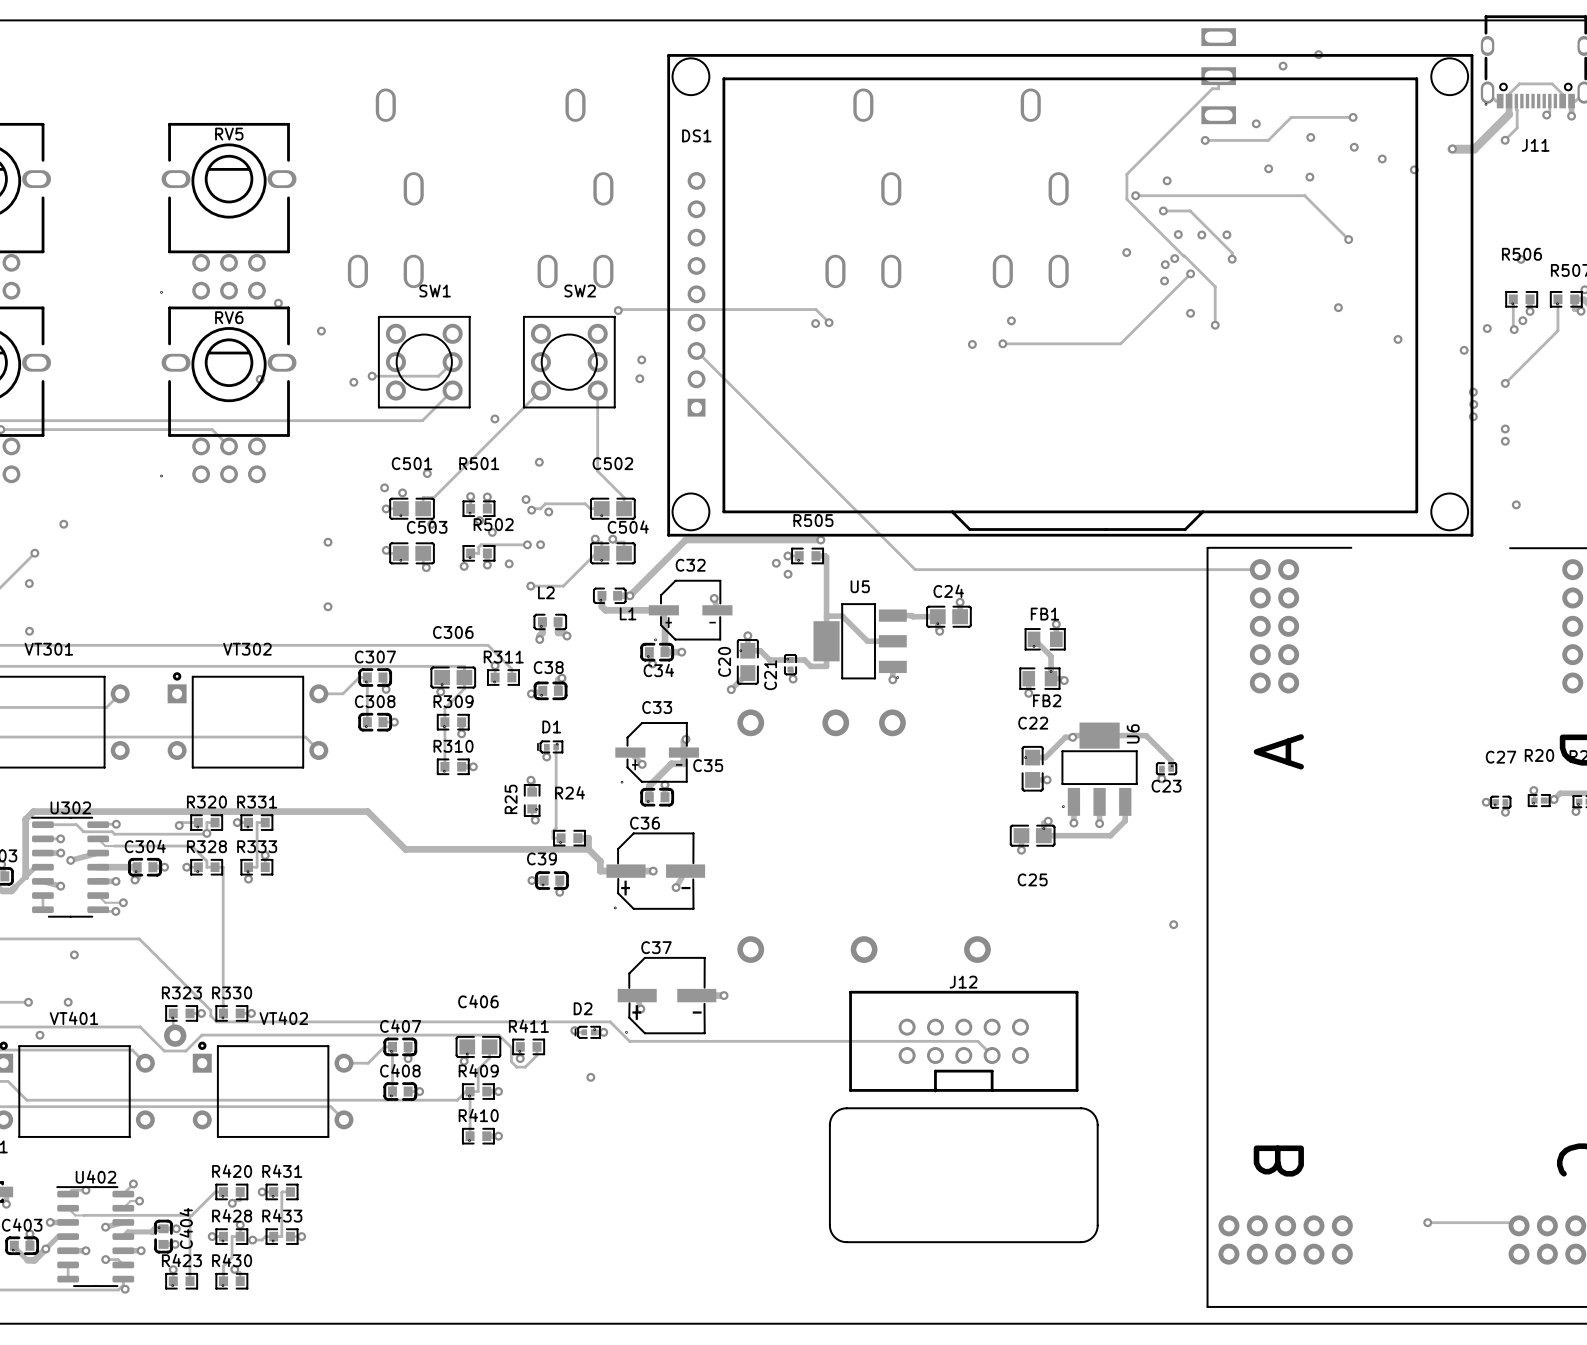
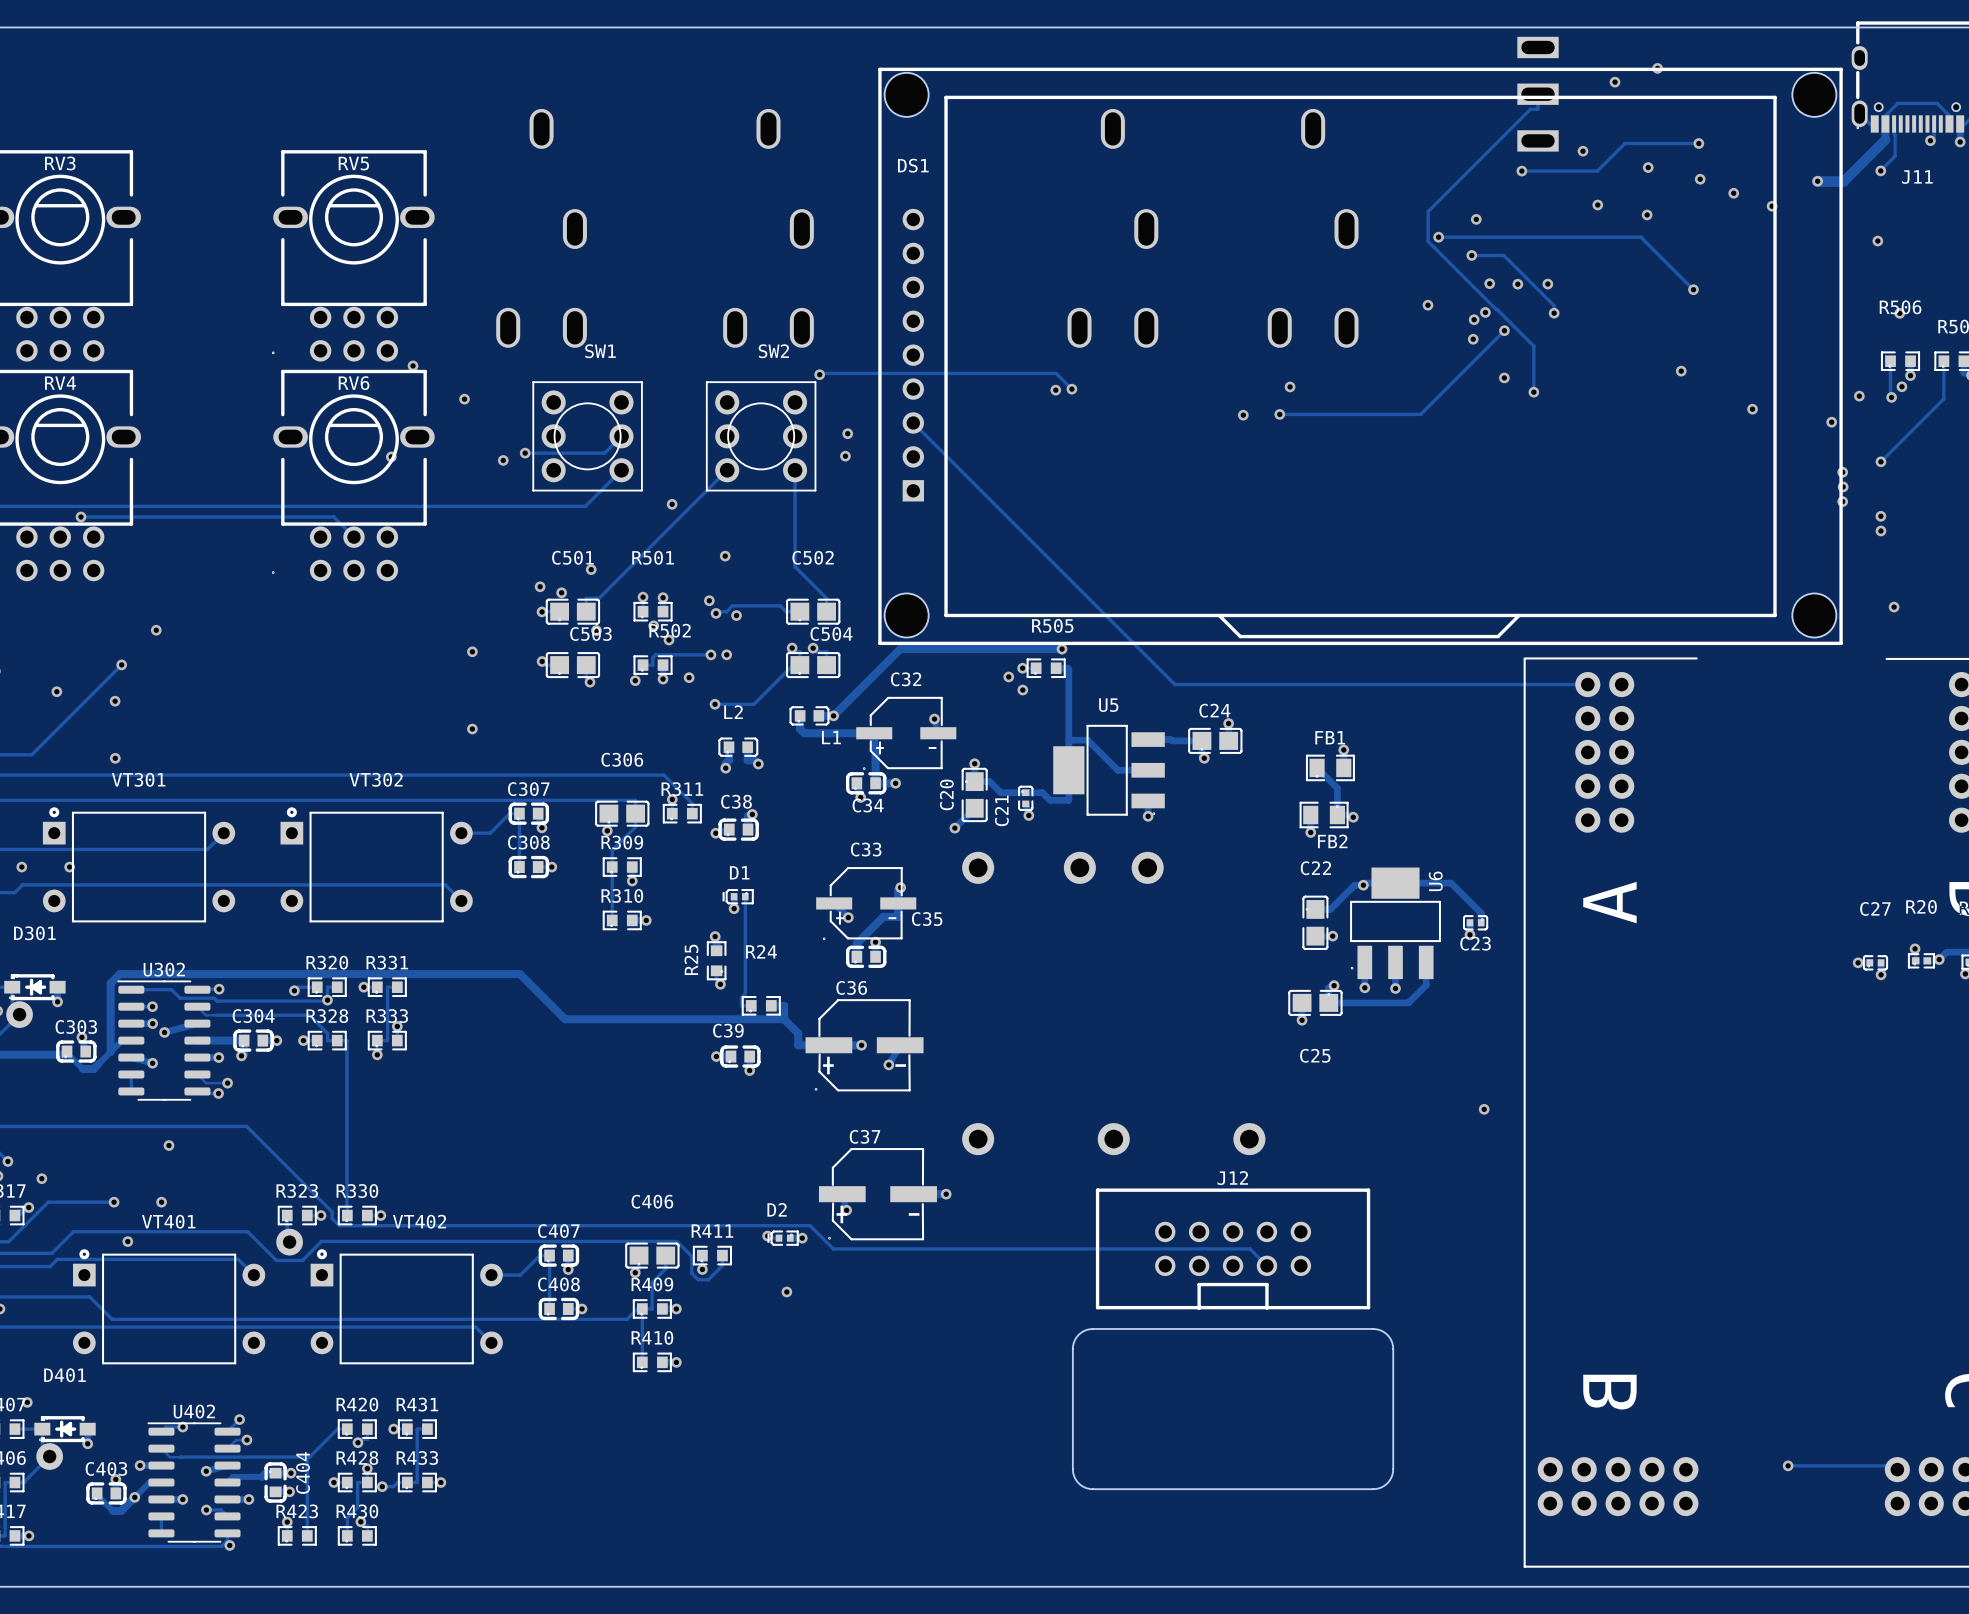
via: none -> (1877, 241)

